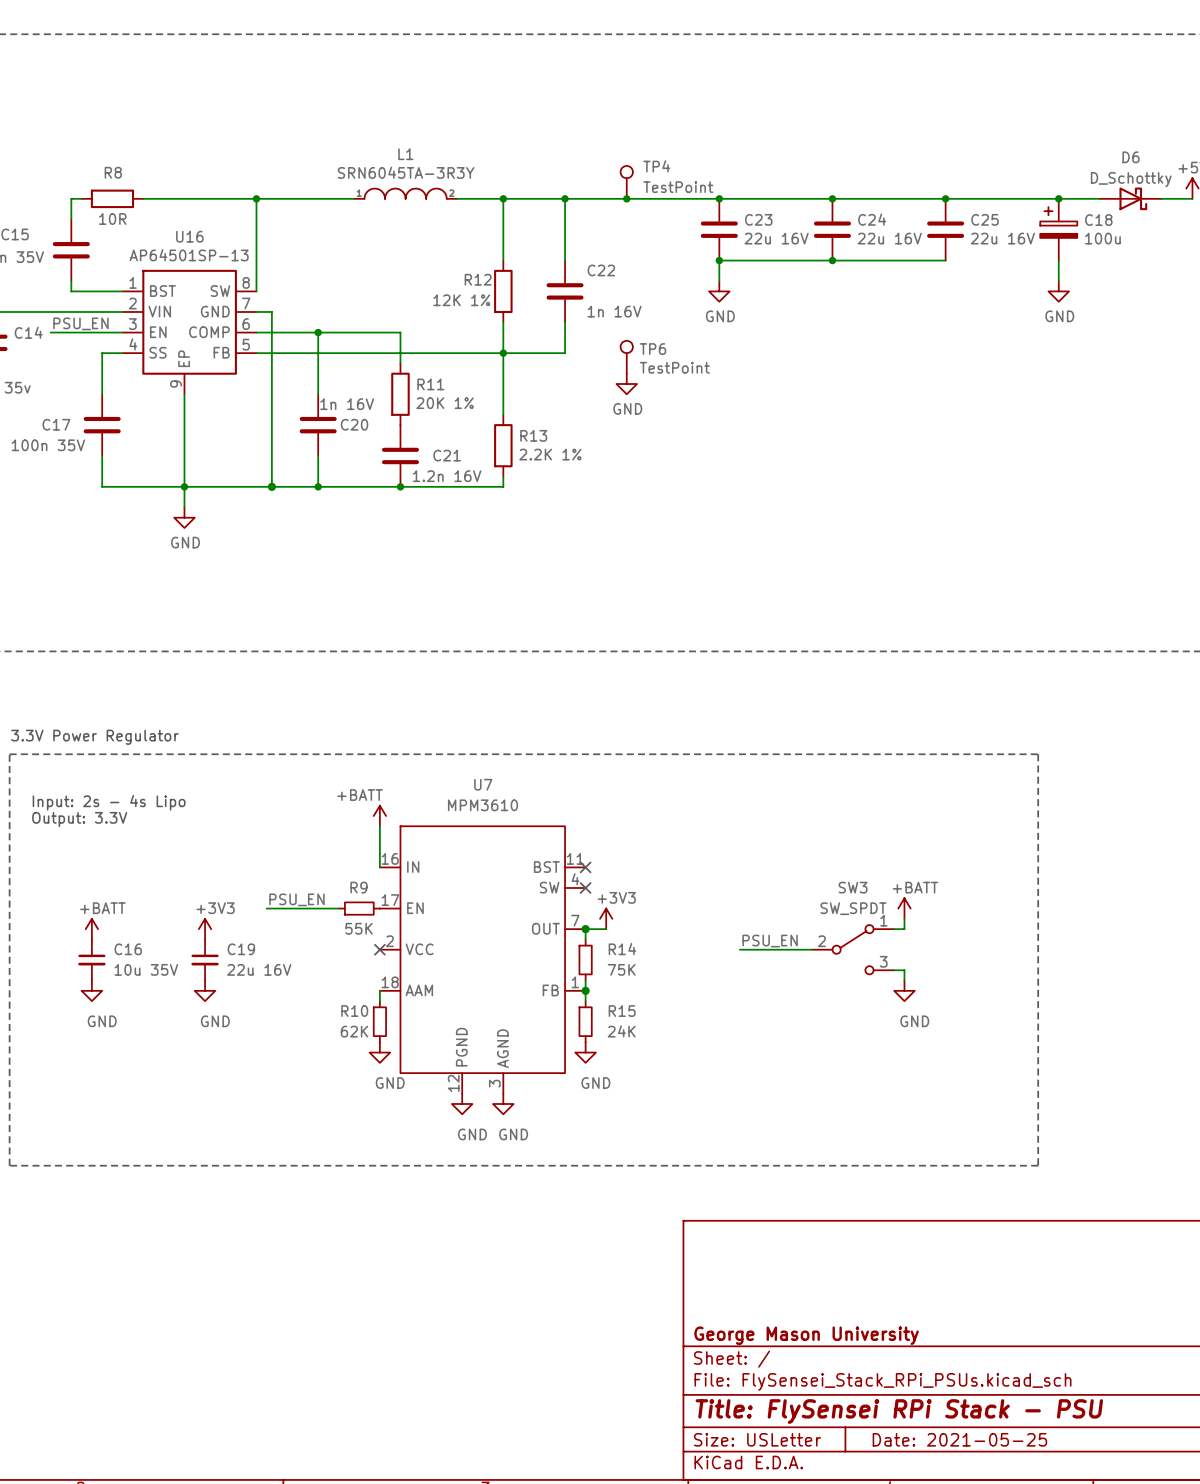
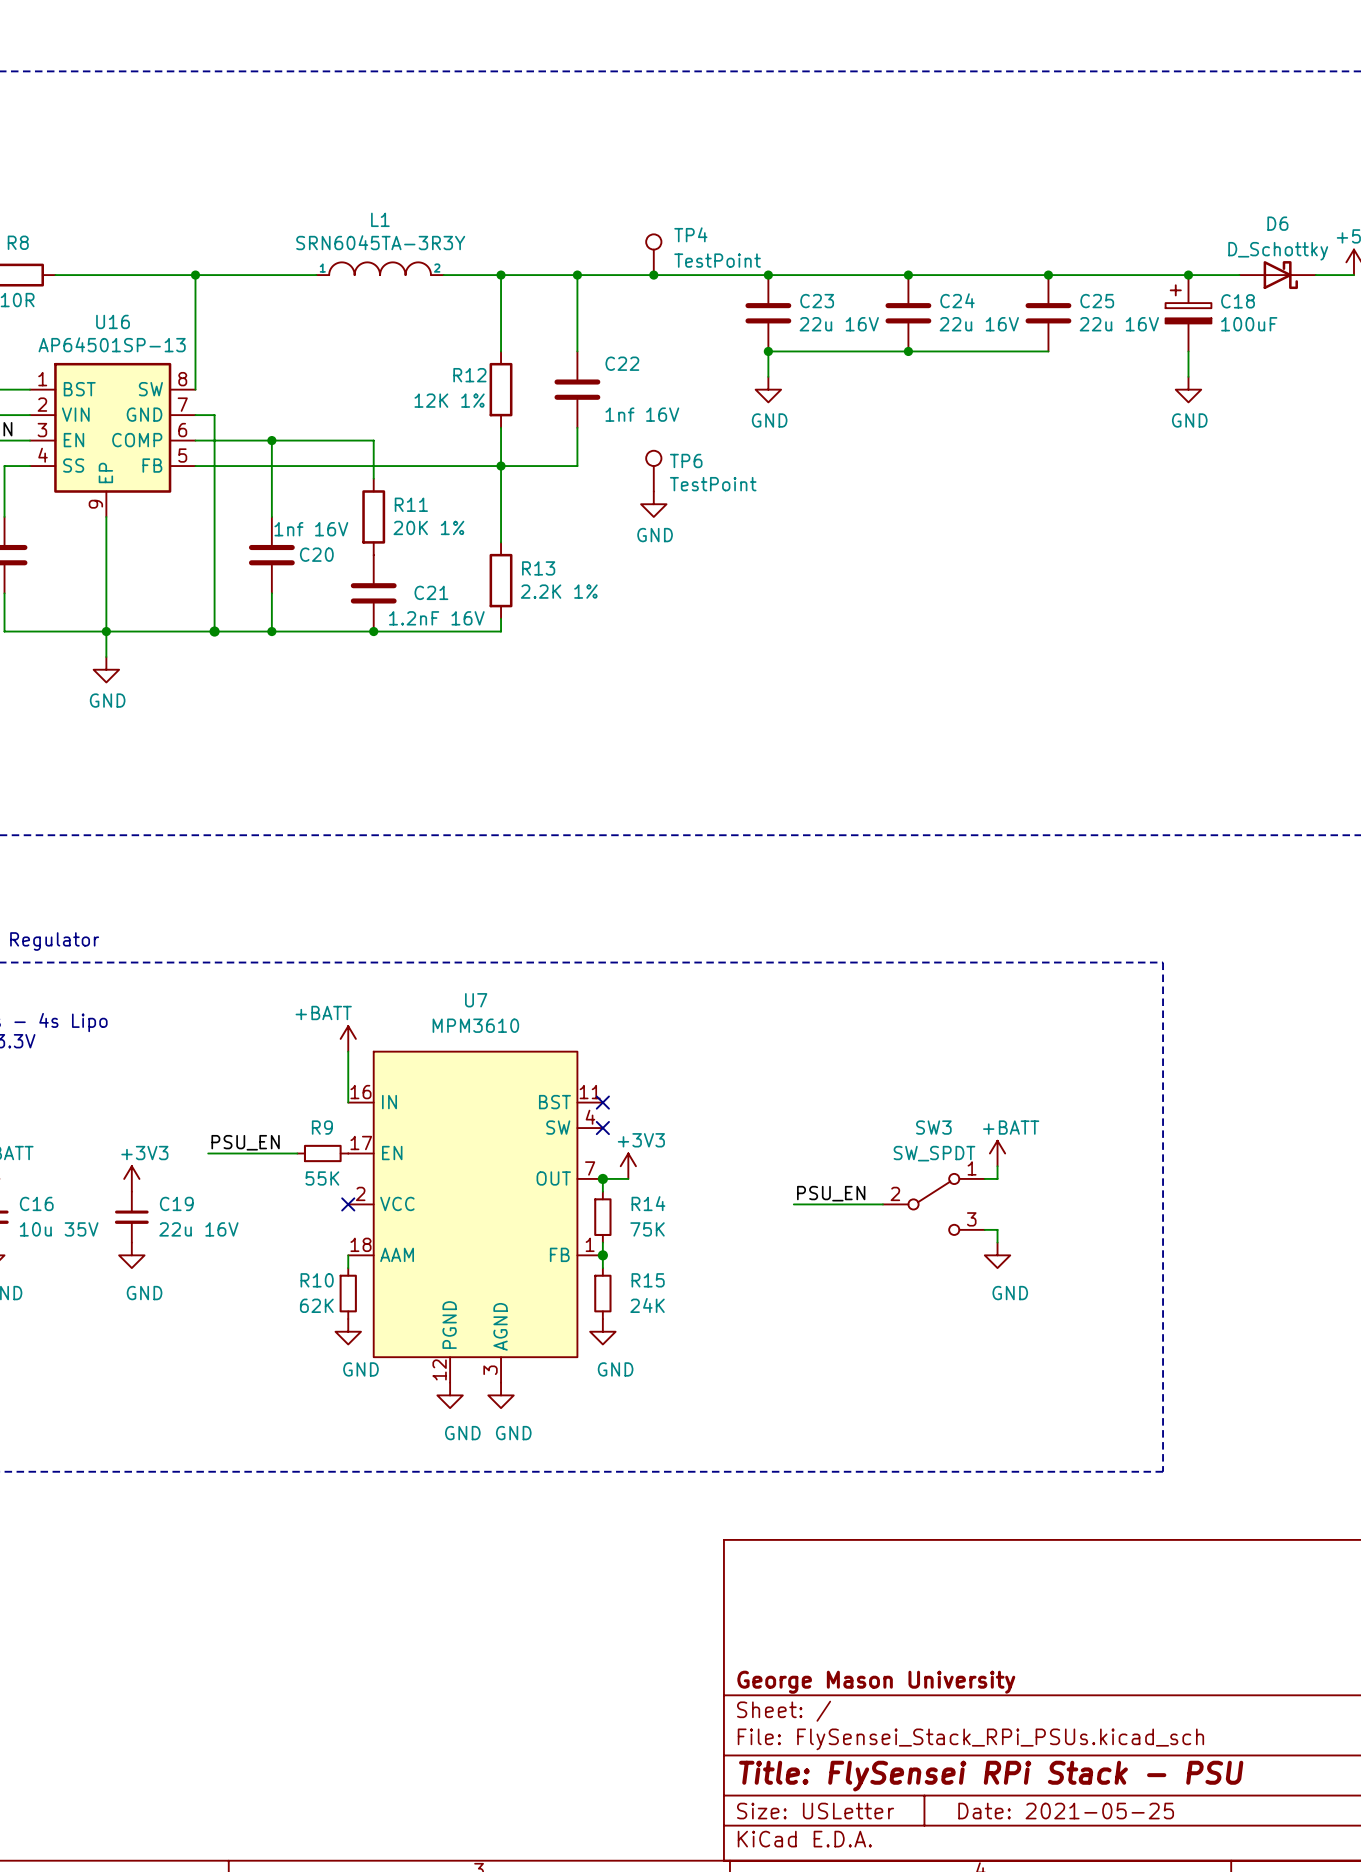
C18 value: 100u (1102, 238) -> 100uF (1249, 324)
C22 value: 1n 16V (614, 311) -> 1nf 16V (642, 414)
C20 value: 1n 16V (347, 404) -> 1nf 16V (311, 529)
C21 value: 1.2n 16V (447, 476) -> 1.2nF 16V (436, 618)

